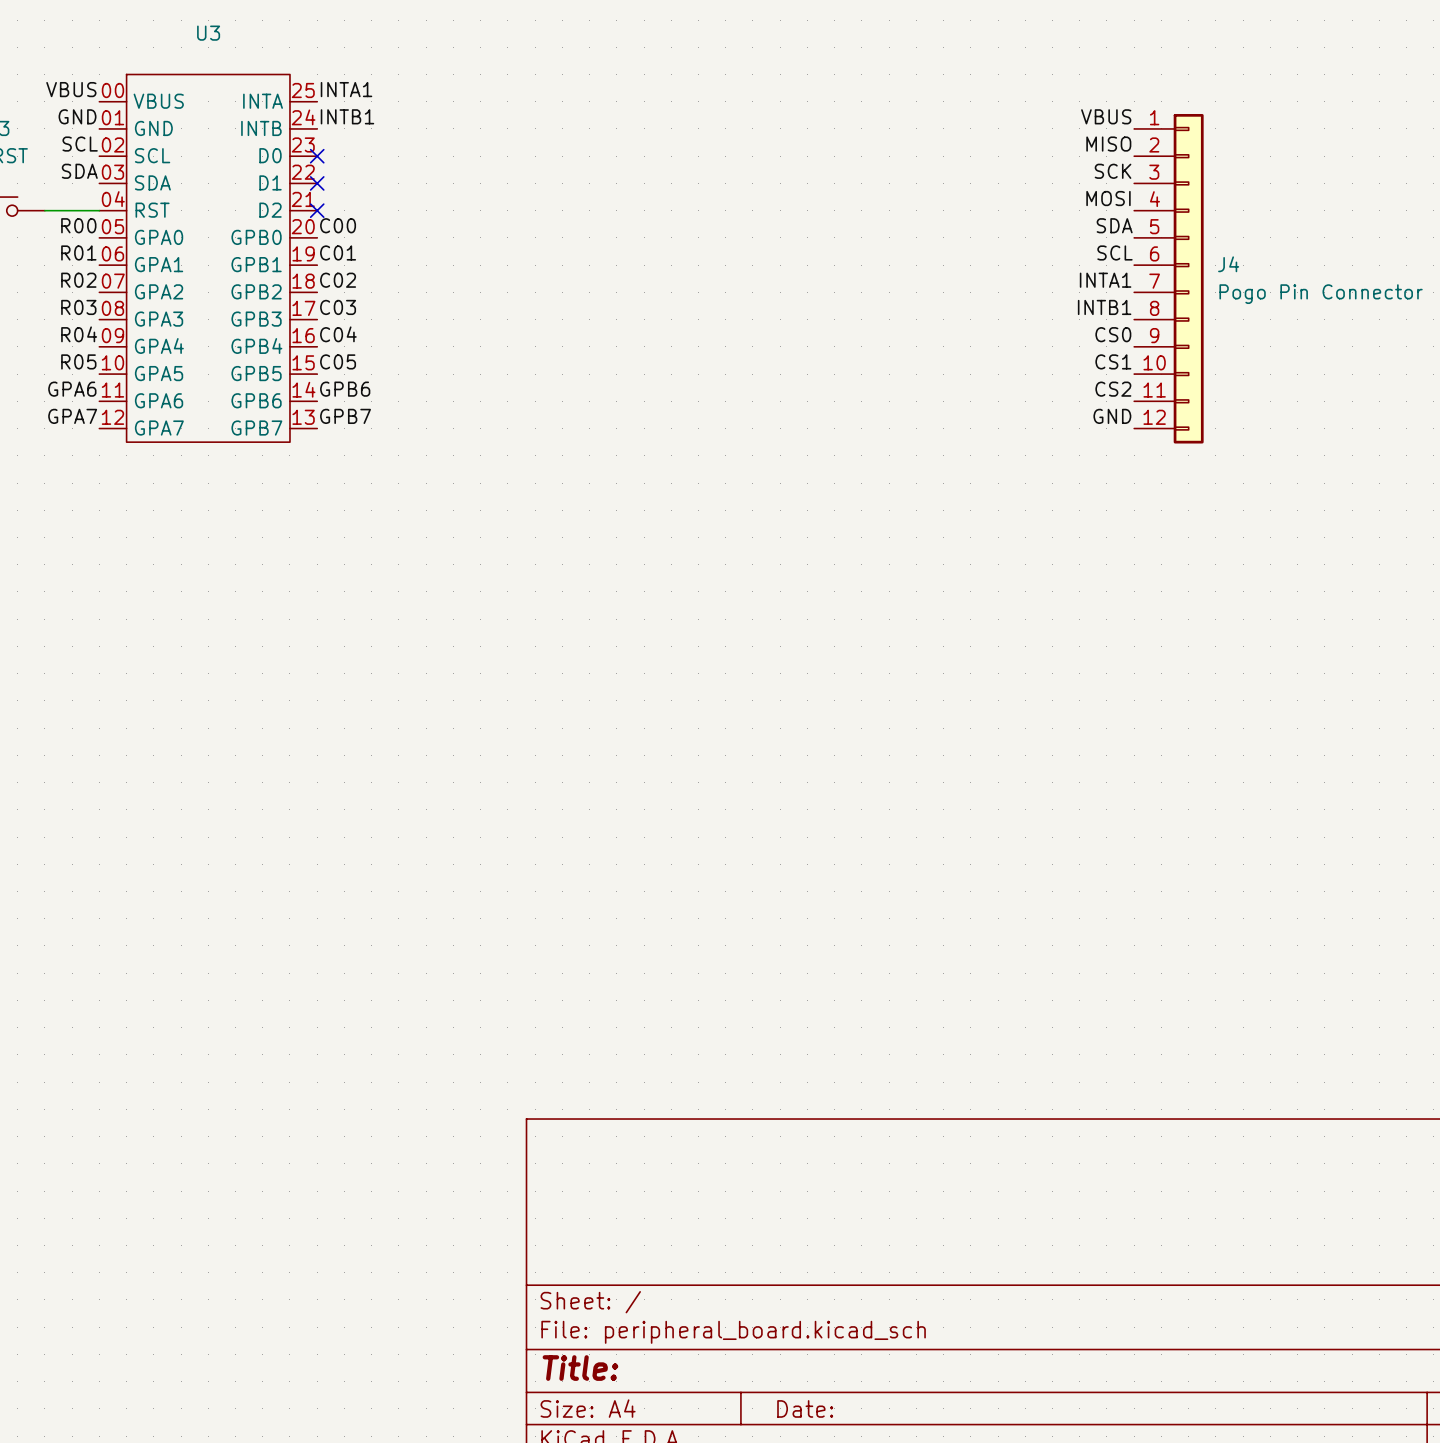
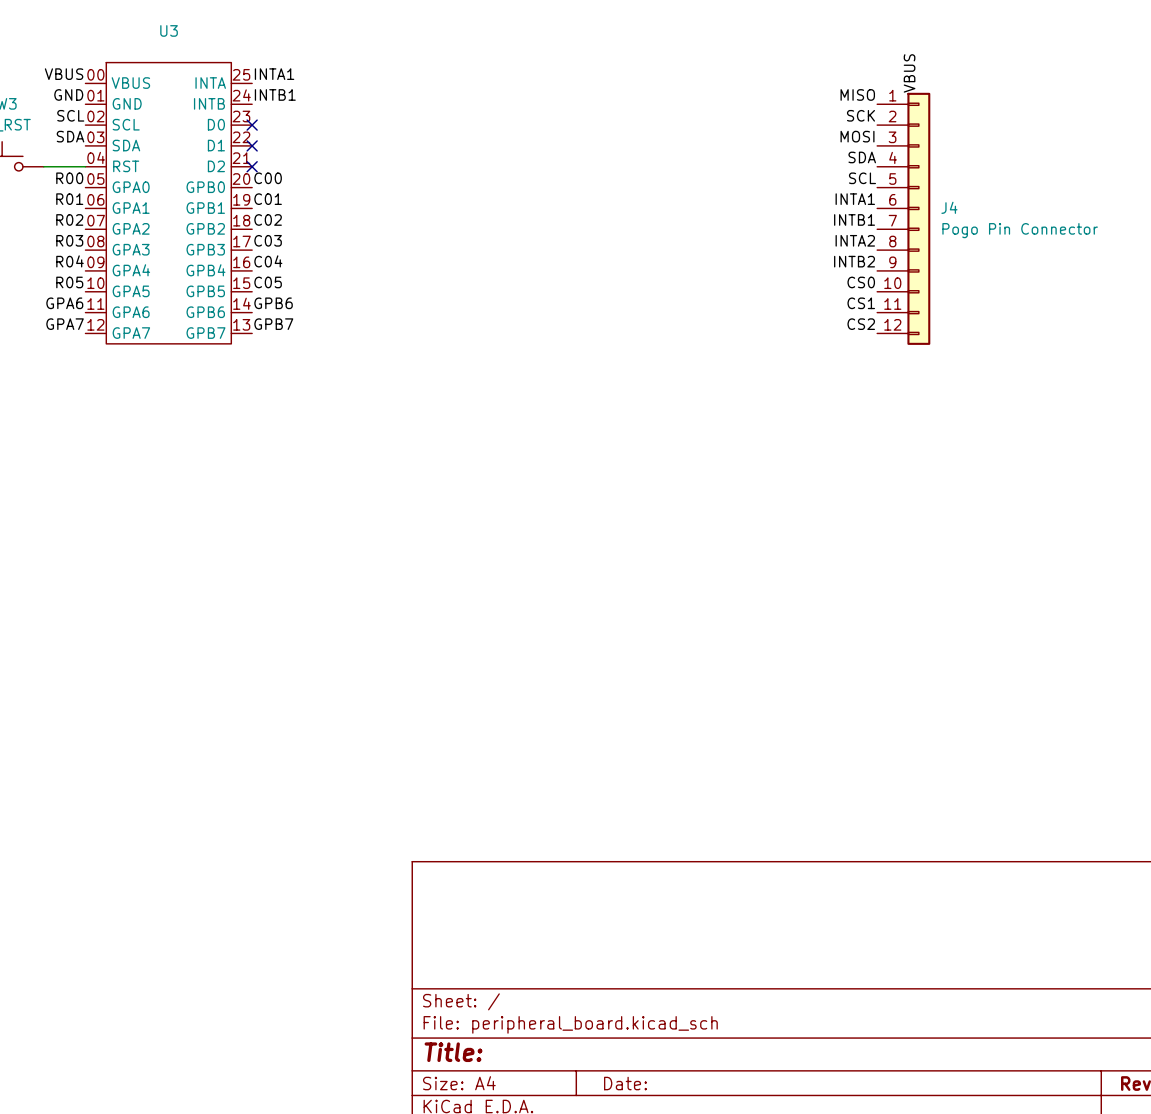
label: none -> VBUS (909, 73)
label: VBUS (1106, 116) -> MISO (857, 94)
label: MISO (1108, 144) -> SCK (860, 115)
label: SCK (1113, 171) -> MOSI (857, 136)
label: MOSI (1108, 198) -> SDA (862, 157)
label: SDA (1114, 225) -> SCL (862, 178)
label: SCL (1114, 252) -> INTA1 (855, 199)
label: INTA1 (1105, 280) -> INTB1 (854, 219)
label: INTB1 (1104, 307) -> INTA2 (855, 240)
label: CS0 (1113, 334) -> INTB2 (854, 261)
label: CS1 (1113, 361) -> CS0 (861, 282)
label: CS2 (1113, 389) -> CS1 (861, 303)
label: GND (1112, 416) -> CS2 (861, 324)

